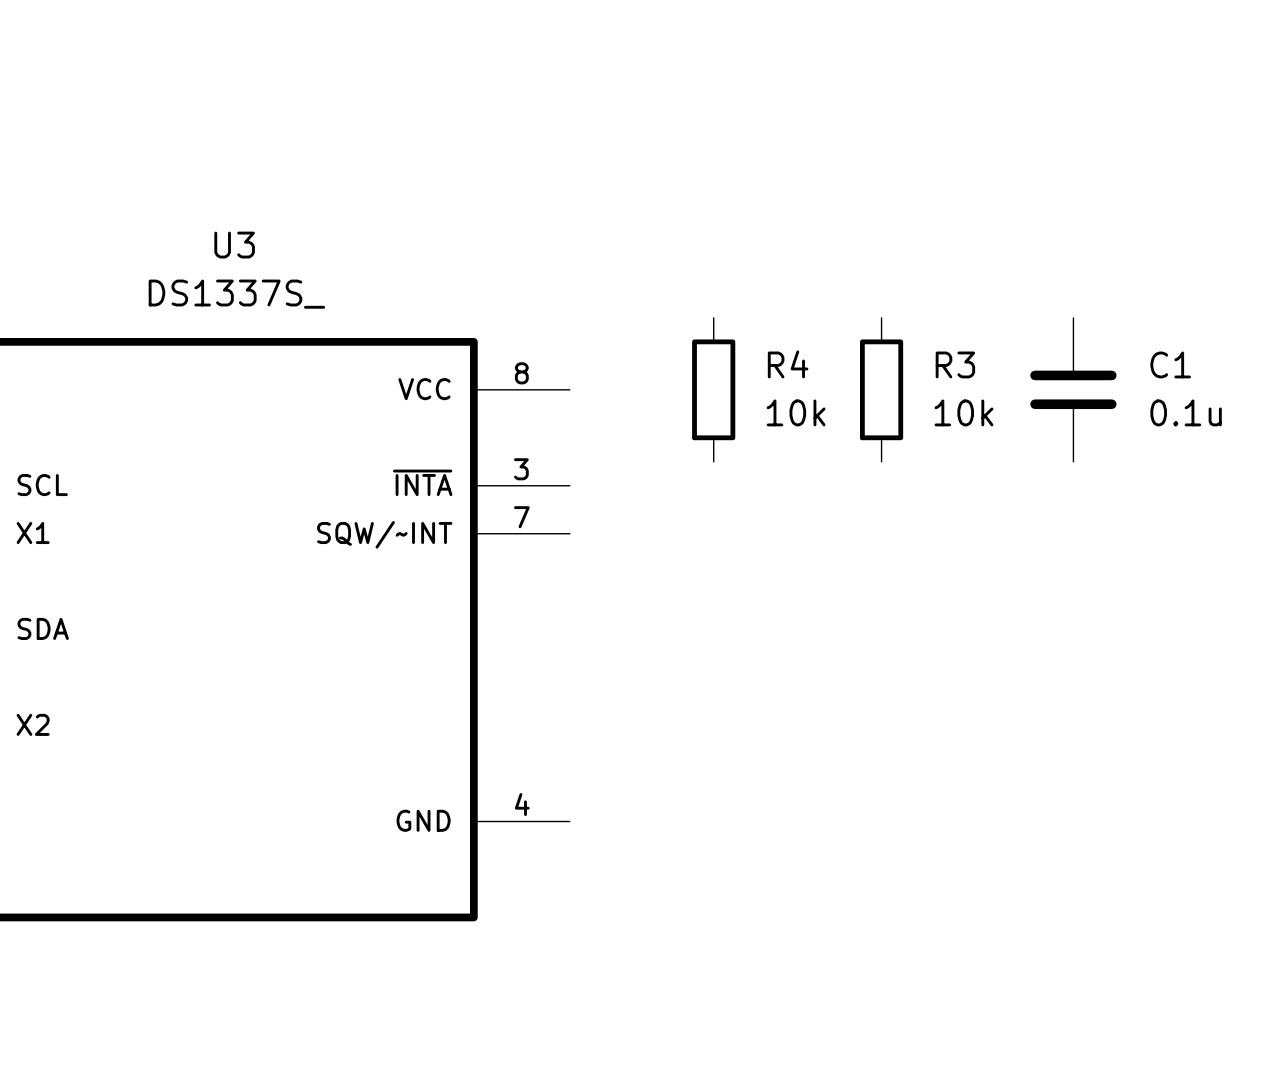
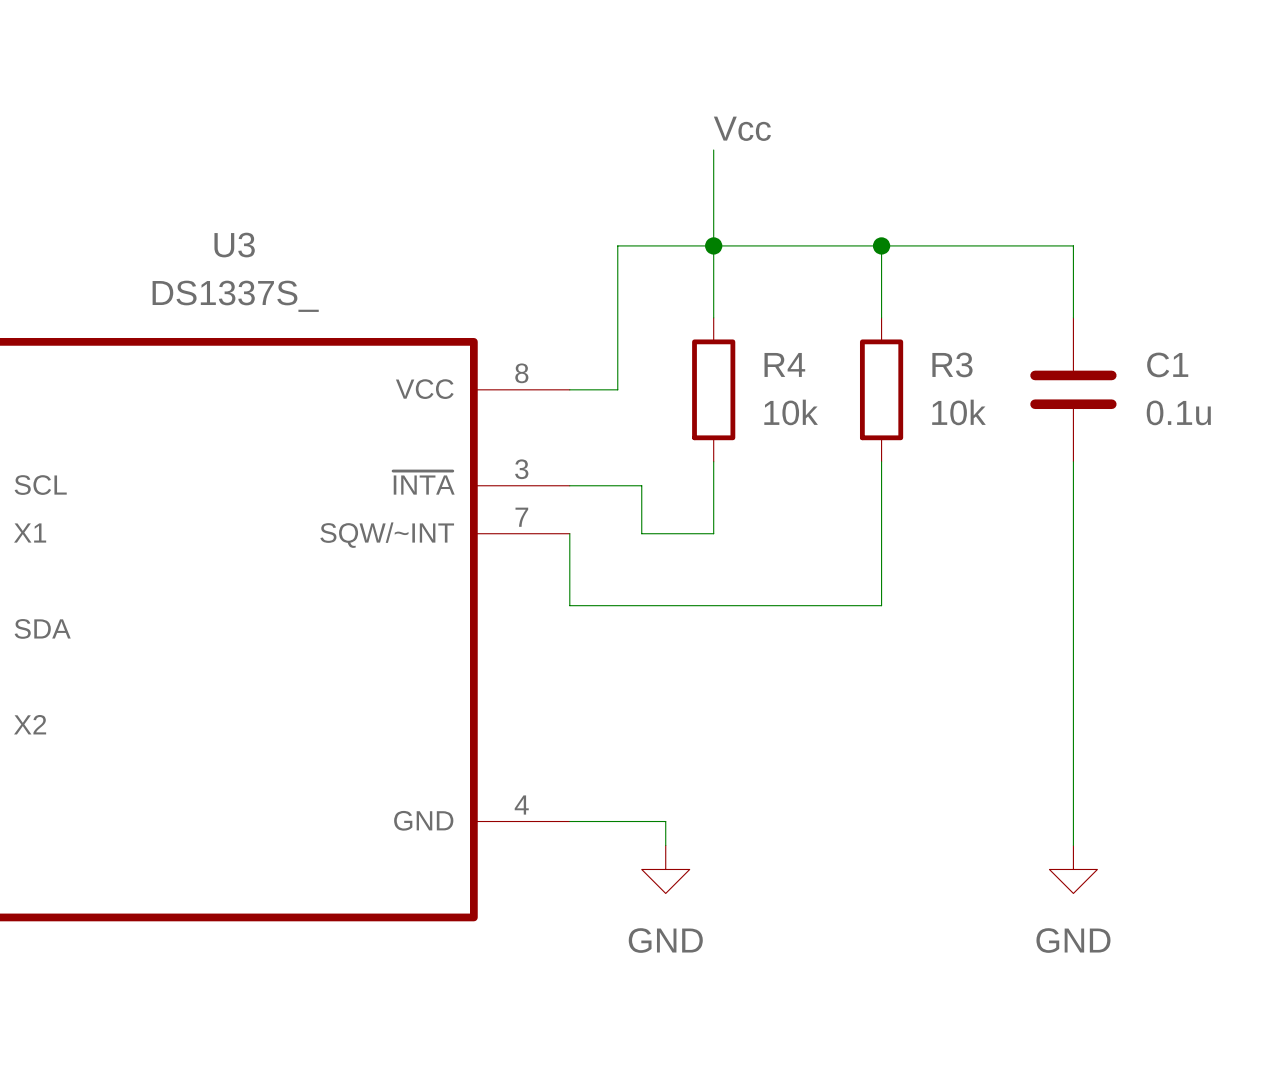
label: none -> Vcc (742, 128)
wire: none -> (713, 150) (713, 317)
junction: none -> (713, 245)
wire: none -> (881, 245) (881, 317)
junction: none -> (881, 245)
wire: none -> (1073, 317) (1073, 245) (617, 245) (617, 389) (569, 389)
wire: none -> (713, 461) (713, 533) (641, 533) (641, 485) (569, 485)
wire: none -> (881, 461) (881, 605) (569, 605) (569, 533)
wire: none -> (1073, 461) (1073, 845)
wire: none -> (569, 821) (665, 821) (665, 845)
power symbol: none -> GND (665, 869)
power symbol: none -> GND (1073, 869)

